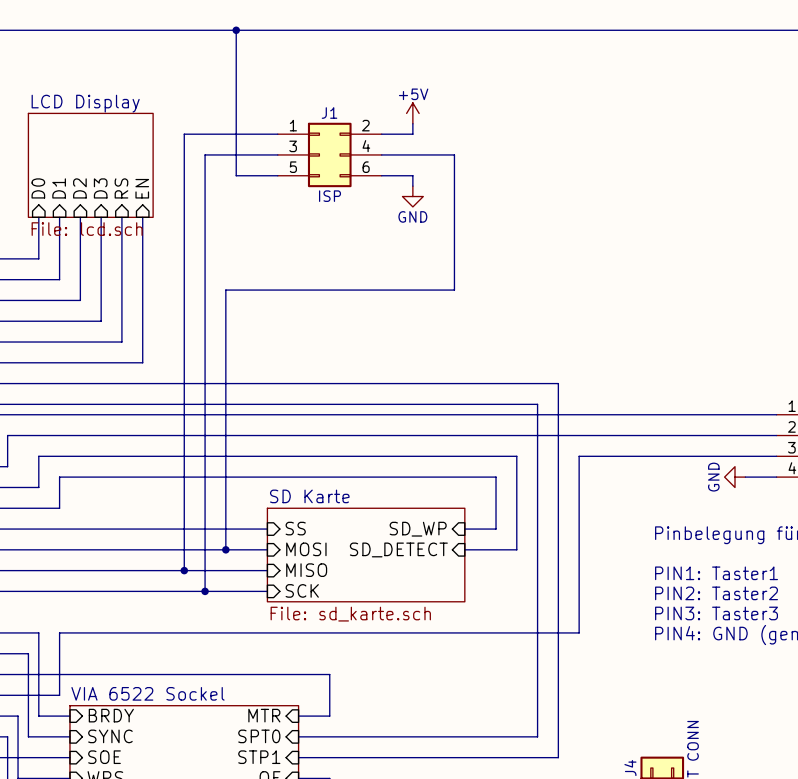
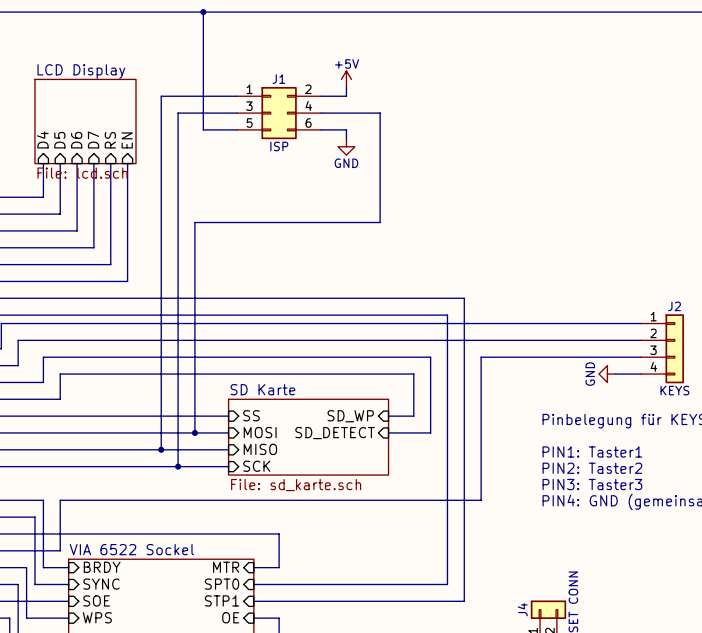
sheet pin: D0 (38, 188) -> D4 (42, 139)
sheet pin: D1 (59, 188) -> D5 (59, 140)
sheet pin: D2 (79, 188) -> D6 (76, 140)
sheet pin: D3 (100, 188) -> D7 (93, 139)

